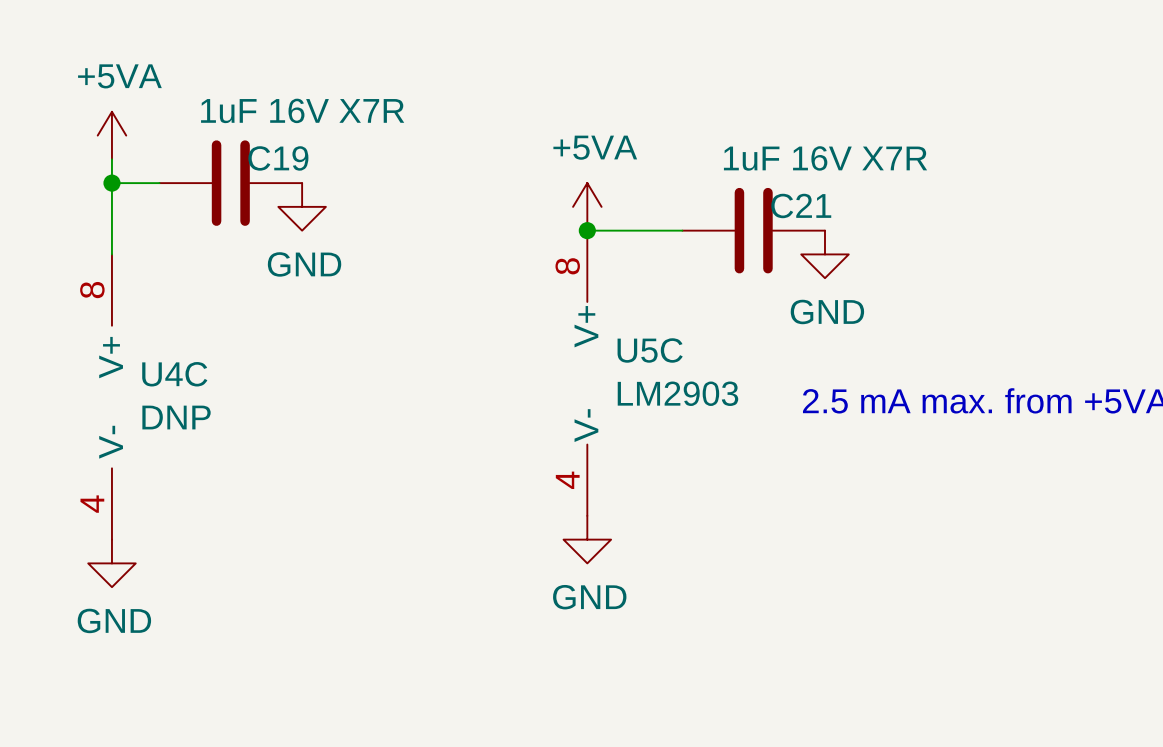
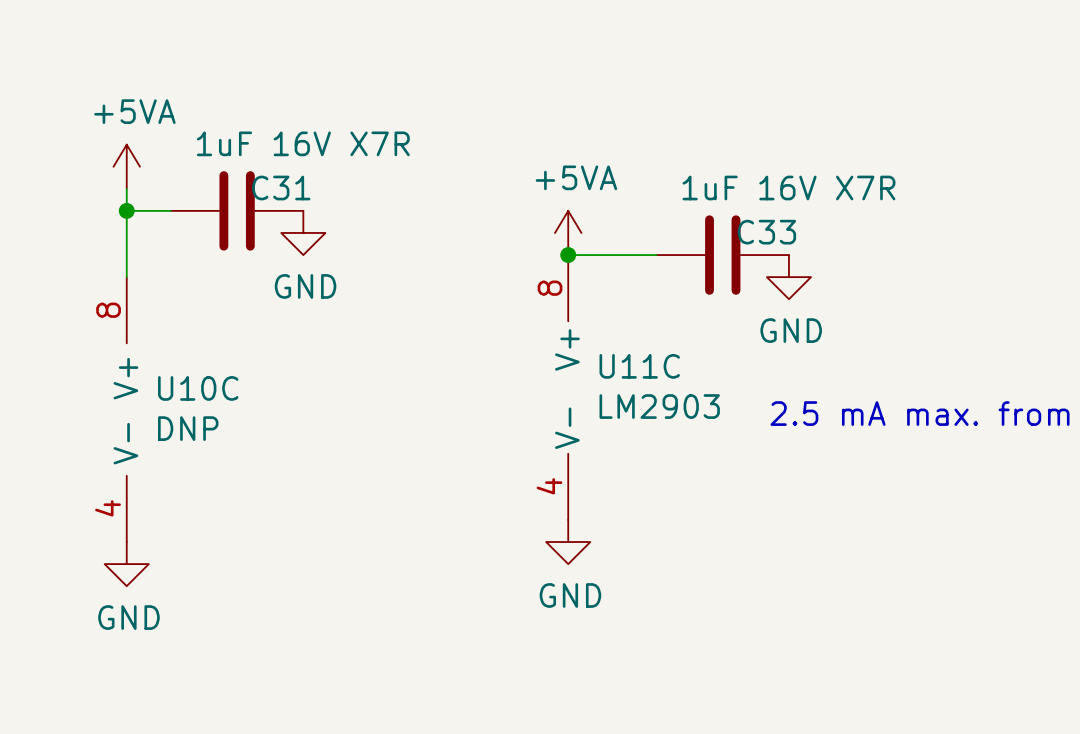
C19 name: C19 (278, 158) -> C31 (281, 188)
C21 name: C21 (801, 205) -> C33 (766, 232)
U5C name: U5C (650, 350) -> U11C (639, 366)
U4C name: U4C (174, 374) -> U10C (198, 388)

